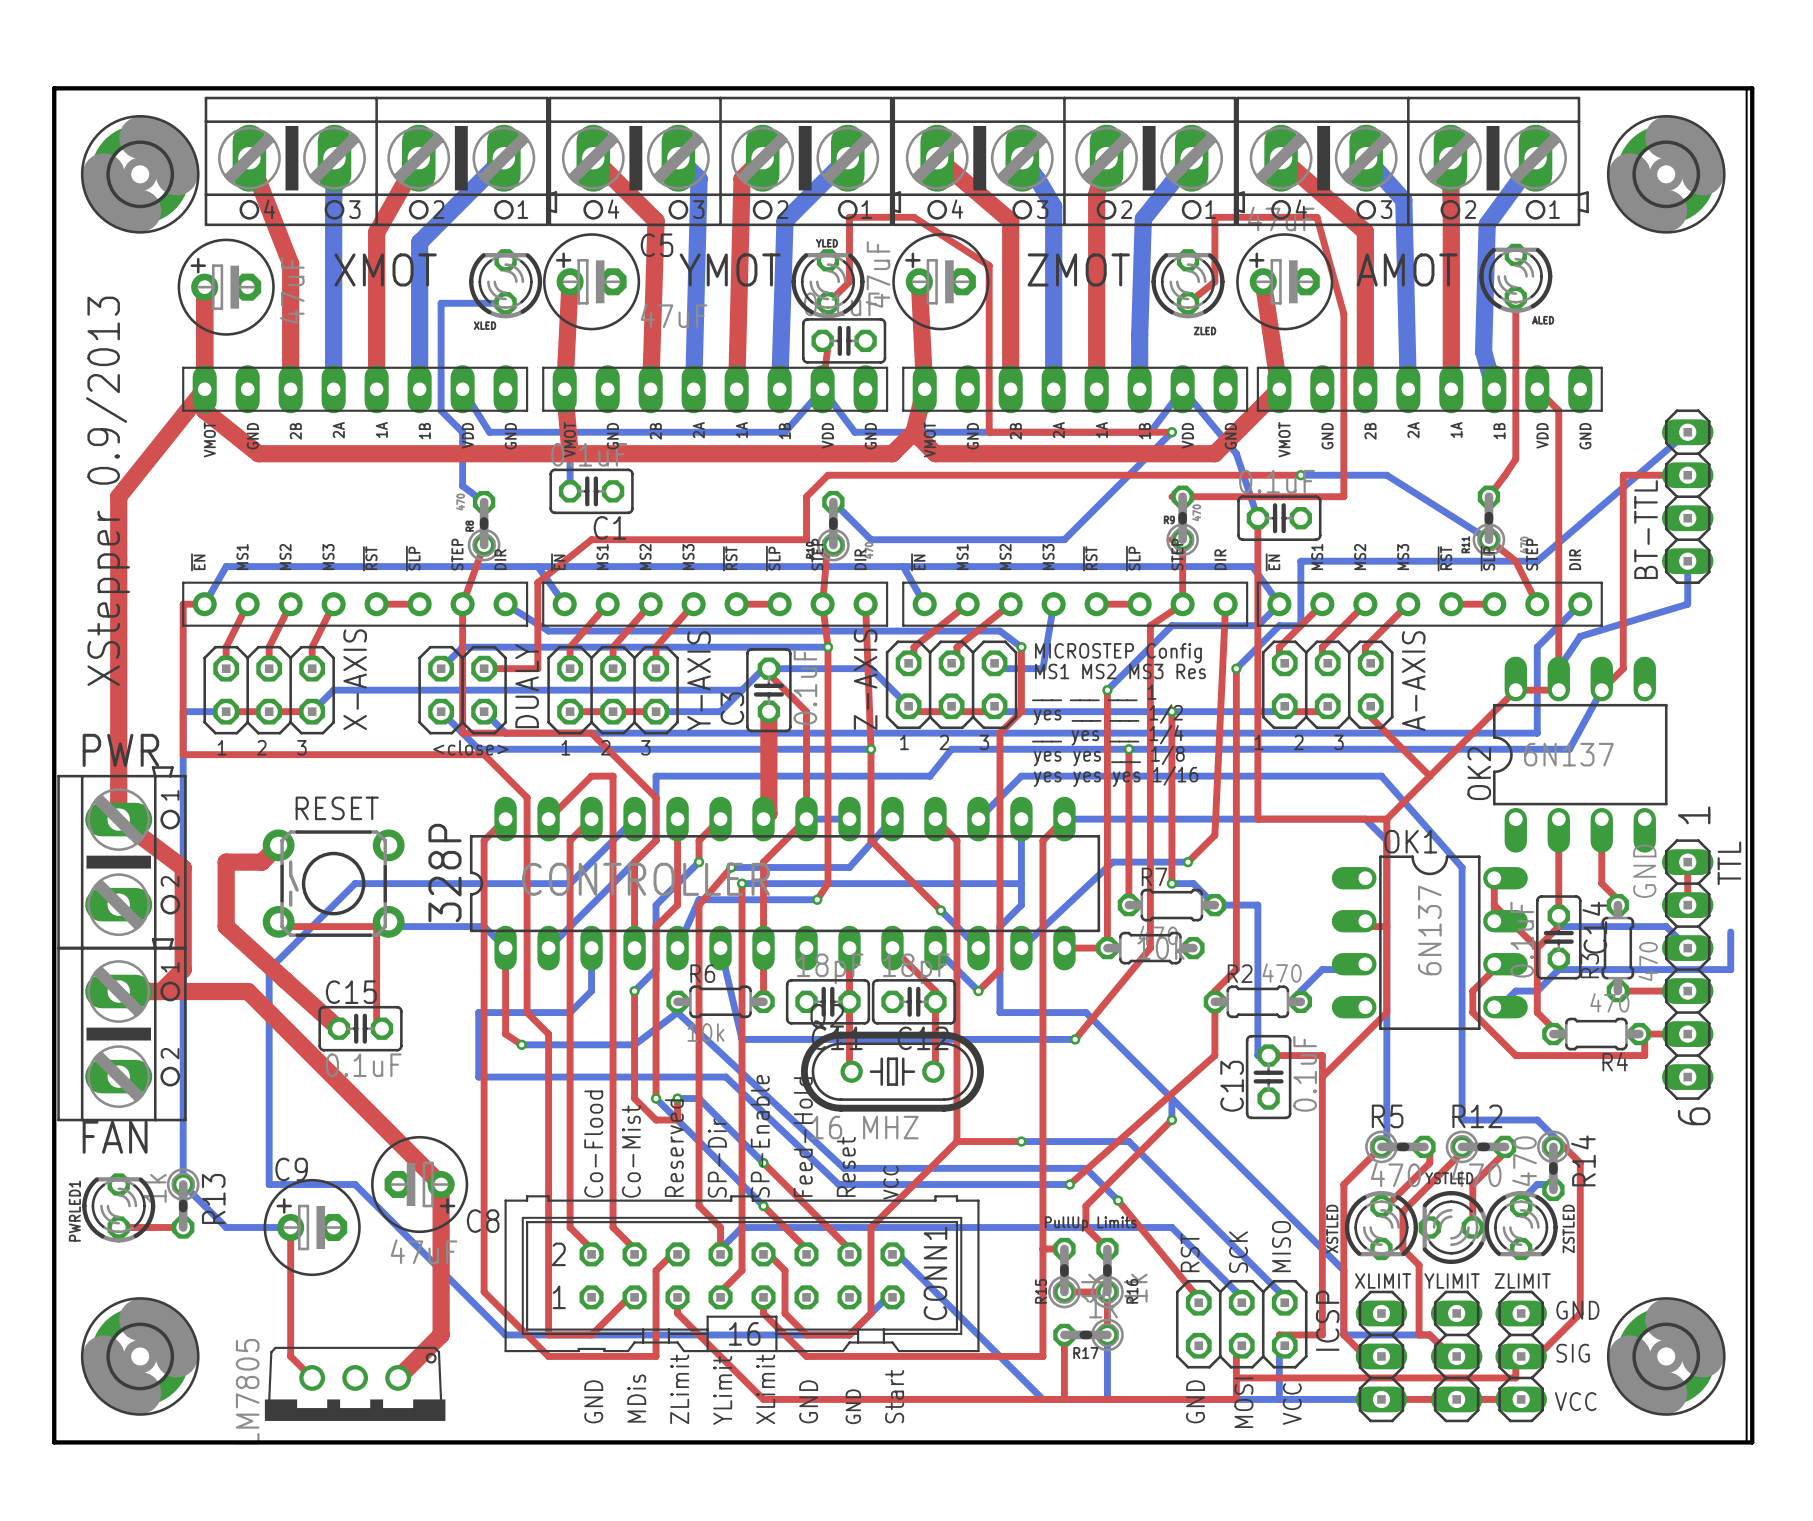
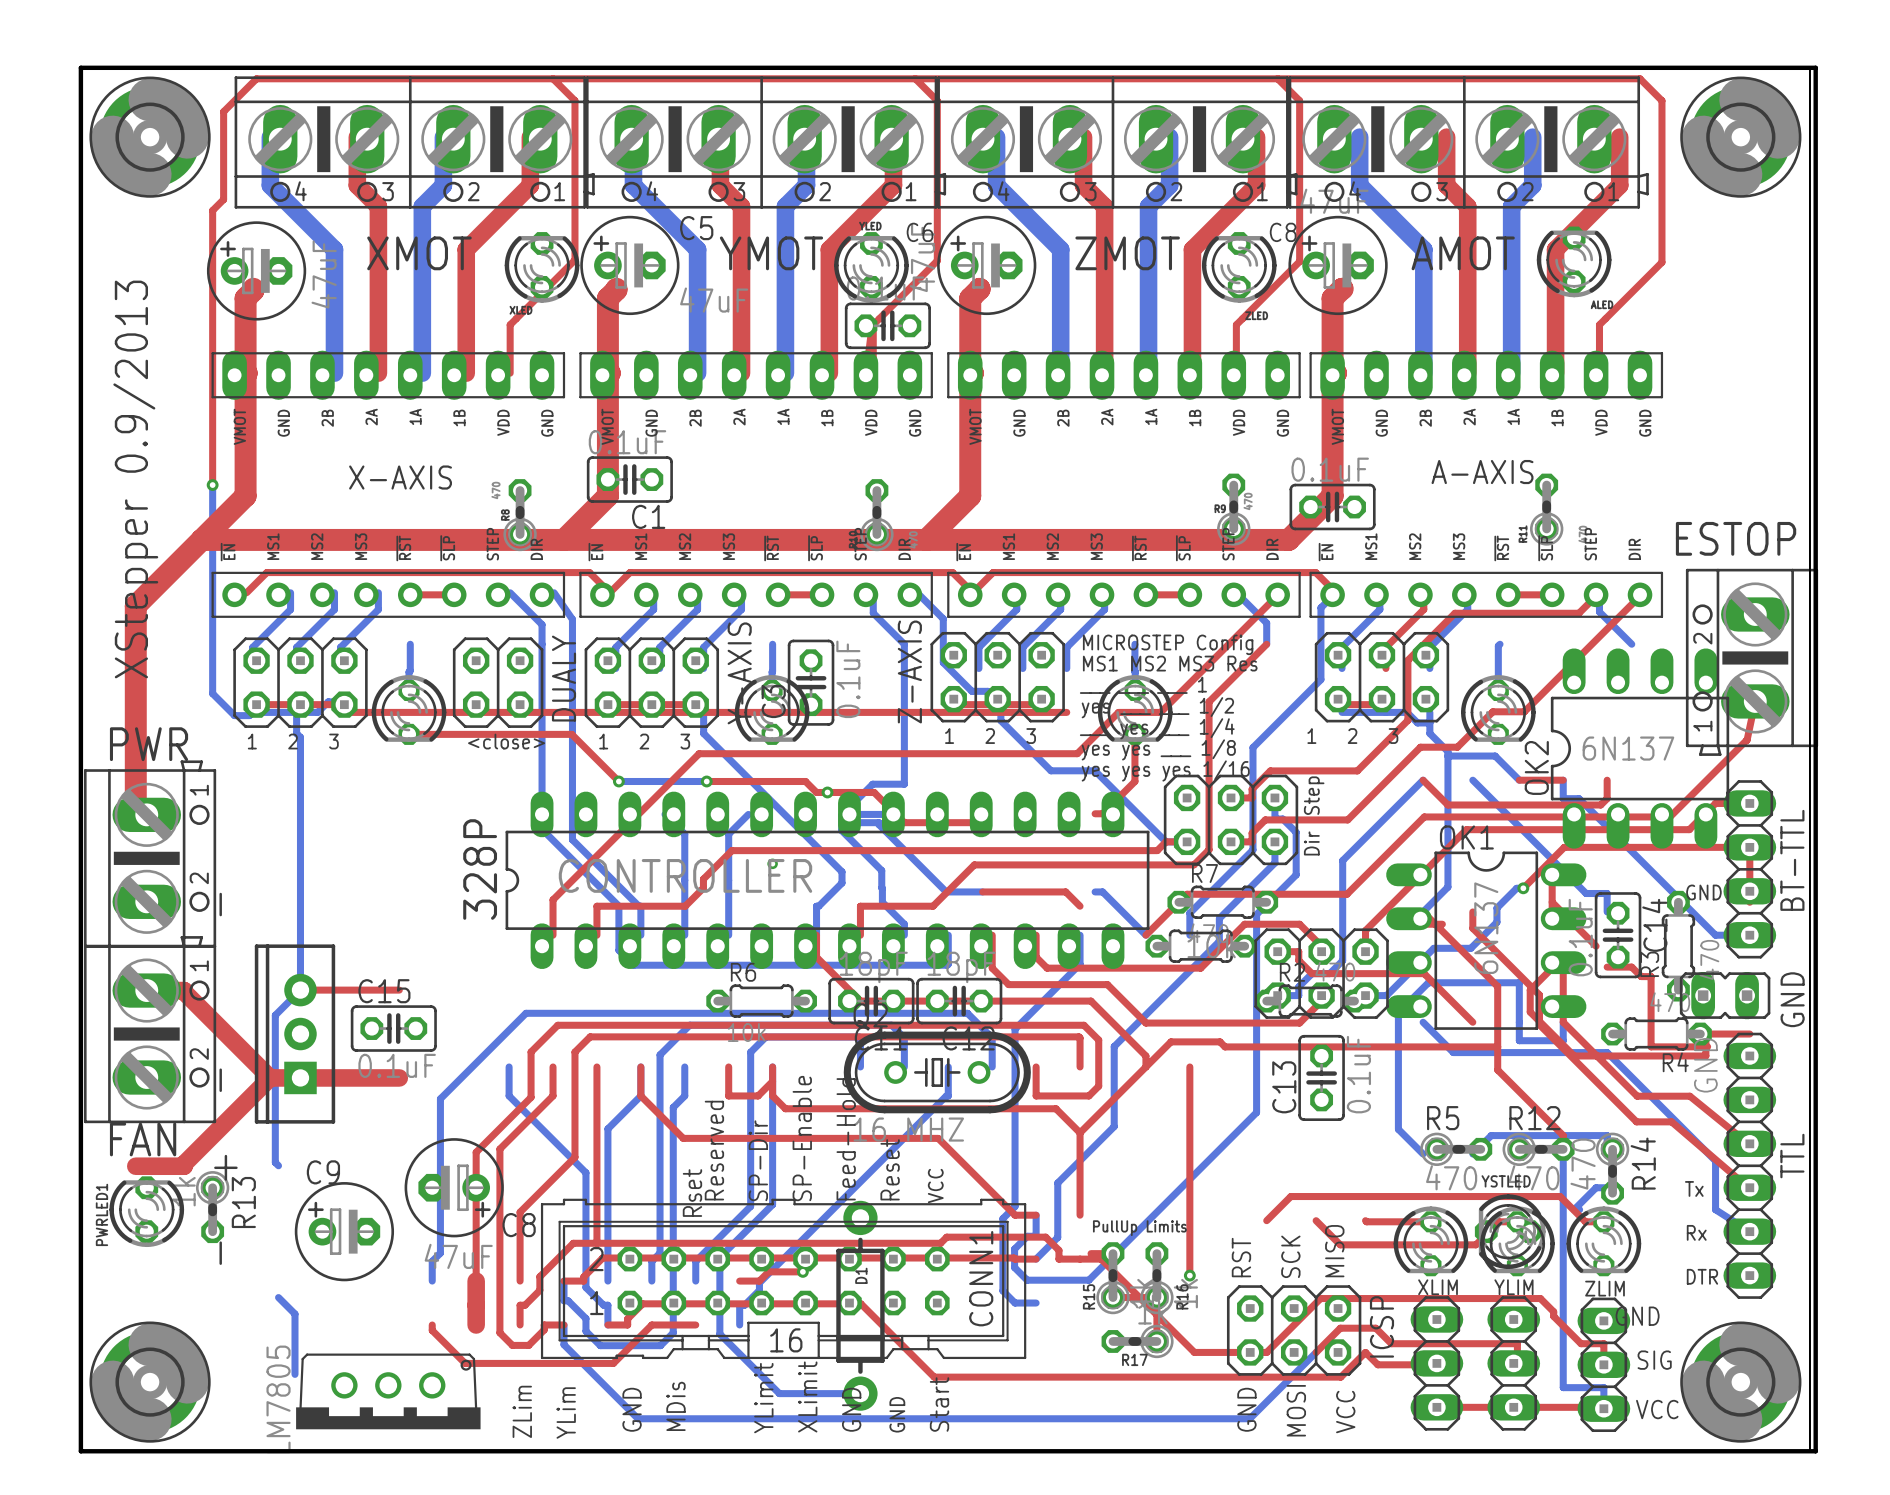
top track: none -> (553, 78) (574, 100) (574, 260) (510, 324) (510, 373)
top track: none -> (915, 78) (937, 100) (937, 260) (873, 324) (873, 373)
top track: none -> (1277, 78) (1299, 100) (1299, 261) (1236, 324) (1236, 373)
bottom track: none -> (270, 137) (270, 185) (334, 249) (334, 373)
top track: none -> (357, 137) (357, 185) (378, 206) (378, 373)
bottom track: none -> (443, 137) (443, 185) (422, 206) (422, 373)
top track: none -> (530, 137) (530, 185) (466, 249) (466, 373)
bottom track: none -> (633, 137) (633, 185) (697, 249) (697, 373)
top track: none -> (720, 137) (720, 185) (741, 206) (741, 373)
bottom track: none -> (806, 137) (806, 185) (785, 206) (785, 373)
top track: none -> (893, 137) (893, 185) (829, 249) (829, 373)
bottom track: none -> (996, 137) (996, 185) (1060, 249) (1060, 373)
top track: none -> (1083, 137) (1083, 185) (1104, 206) (1104, 373)
bottom track: none -> (1169, 137) (1169, 185) (1148, 206) (1148, 373)
top track: none -> (1256, 137) (1256, 185) (1192, 249) (1192, 373)
bottom track: none -> (1359, 137) (1359, 185) (1423, 249) (1423, 373)
top track: none -> (1446, 137) (1446, 185) (1467, 206) (1467, 373)
bottom track: none -> (1532, 137) (1532, 185) (1511, 206) (1511, 373)
top track: none -> (1619, 137) (1619, 185) (1555, 249) (1555, 373)
top track: (249, 158) (290, 263) (290, 389) -> none
bottom track: (334, 158) (333, 389) -> none
top track: (418, 158) (376, 232) (376, 389) -> none
bottom track: (503, 158) (419, 242) (419, 389) -> none
top track: (593, 158) (656, 220) (650, 389) -> none
bottom track: (678, 158) (699, 178) (693, 389) -> none
top track: (762, 158) (742, 178) (736, 389) -> none
bottom track: (847, 158) (785, 220) (779, 389) -> none
top track: (937, 158) (1010, 220) (1010, 389) -> none
bottom track: (1022, 158) (1053, 206) (1053, 389) -> none
top track: (1106, 158) (1096, 194) (1096, 389) -> none
bottom track: (1191, 158) (1143, 219) (1139, 389) -> none
top track: (1281, 158) (1365, 231) (1365, 389) -> none
bottom track: (1366, 158) (1403, 200) (1408, 389) -> none
top track: (1450, 158) (1451, 389) -> none
bottom track: (1535, 158) (1487, 224) (1483, 351) (1494, 389) -> none
part position: (140, 174) -> (150, 137)
part position: (1666, 174) -> (1740, 137)
text: none -> C6 (920, 232)
text: none -> C8 (1283, 232)
top track: (570, 281) (564, 389) (570, 453) -> none
top track: (919, 281) (924, 389) (913, 432) -> none
top track: (1263, 281) (1279, 389) (1214, 453) (935, 453) (913, 432) -> none
top track: (204, 287) (204, 410) (258, 453) (892, 453) (913, 432) -> none
top track: (1515, 297) (1515, 459) (1488, 496) -> none
bottom track: (505, 303) (441, 303) (441, 410) (462, 432) (462, 485) (484, 502) -> none
top track: (828, 303) (849, 281) (849, 217) (913, 217) (989, 265) (989, 432) (1171, 432) -> none
top track: (1188, 303) (1214, 281) (1214, 217) (1316, 217) (1343, 314) (1343, 496) (1171, 496) -> none
top track: none -> (253, 288) (245, 298) (245, 496) (135, 605) (135, 814)
top track: none -> (616, 288) (607, 298) (607, 371) (609, 373) (607, 375) (607, 496) (564, 539)
top track: none -> (979, 289) (970, 298) (970, 370) (972, 373) (970, 375) (970, 496) (926, 539)
top track: none -> (1342, 288) (1332, 298) (1332, 369) (1335, 373) (1332, 376) (1332, 496) (1288, 539) (201, 539)
top track: none -> (1599, 373) (1599, 324) (1661, 262) (1661, 100) (1640, 78) (256, 78) (223, 111) (223, 199) (212, 210) (212, 485)
top track: (204, 389) (118, 496) (118, 819) (183, 867) (183, 969) (161, 991) -> none
bottom track: (462, 389) (489, 432) (785, 432) (822, 389) (854, 432) (1150, 432) (1182, 389) (1236, 453) (1257, 518) -> none
top track: (1537, 389) (1558, 410) (1558, 690) (1515, 690) (1386, 819) -> none
bottom track: (1171, 432) (1064, 539) (870, 539) (828, 496) -> none
via: (1171, 432) -> none
bottom track: (1687, 432) (1537, 561) (1300, 561) (1300, 625) (1279, 625) (1236, 668) -> none
top track: (1300, 475) (828, 475) (806, 496) (806, 539) (591, 539) (537, 582) (537, 668) (484, 668) -> none
bottom track: (1300, 475) (1386, 475) (1488, 539) -> none
via: (1300, 475) -> none
top track: (1687, 475) (1623, 475) (1623, 668) (1601, 690) -> none
bottom track: none -> (212, 485) (212, 693) (234, 715) (249, 715) (252, 712) (317, 712) (328, 701) (340, 701) (340, 712)
via: none -> (212, 485)
BT-TTL position: (1687, 496) -> (1749, 869)
top track: (1257, 518) (1257, 819) (1386, 819) -> none
BT-TTL name position: BT-TTL (1646, 529) -> BT-TTL (1792, 860)
top track: (484, 539) (484, 545) (462, 604) (462, 733) (591, 733) (656, 797) (656, 840) (634, 862) (634, 948) -> none
top track: (1171, 539) (1182, 539) (1182, 604) (1150, 625) (1150, 948) (1075, 1039) -> none
top track: (1488, 539) (1515, 561) (1537, 604) -> none
top track: (833, 545) (828, 539) (822, 604) (828, 647) (828, 883) (817, 899) -> none
bottom track: (1687, 561) (1687, 604) (1580, 636) (1558, 668) (1558, 690) -> none
bottom track: (537, 566) (564, 604) -> none
bottom track: (903, 566) (924, 604) -> none
top track: none -> (246, 592) (266, 572) (589, 572) (609, 592) (629, 572) (952, 572) (972, 592) (993, 572) (1315, 572) (1335, 592)
bottom track: none -> (290, 592) (290, 609) (252, 647) (252, 668)
bottom track: none -> (334, 592) (334, 609) (296, 647) (296, 668)
bottom track: none -> (378, 592) (378, 609) (340, 647) (340, 668)
bottom track: none -> (510, 592) (542, 624) (542, 829) (618, 906) (618, 950) (633, 965) (947, 965) (948, 935)
bottom track: none -> (554, 592) (572, 619) (572, 839) (640, 906) (640, 935)
bottom track: none -> (653, 592) (653, 609) (615, 647) (615, 668)
bottom track: none -> (697, 592) (697, 609) (659, 647) (659, 668)
bottom track: none -> (741, 592) (741, 609) (703, 647) (703, 668)
bottom track: none -> (873, 592) (873, 613) (904, 644) (904, 784) (872, 784) (841, 815) (841, 830) (881, 870) (882, 902) (904, 924) (904, 935)
bottom track: none -> (917, 592) (943, 618) (943, 662) (971, 691) (987, 691) (1000, 704) (1000, 720) (1050, 770) (1094, 770) (1166, 841) (1187, 841)
bottom track: none -> (1016, 592) (1016, 609) (978, 647) (978, 668)
bottom track: none -> (1060, 592) (1060, 609) (1022, 647) (1022, 668)
bottom track: none -> (1104, 592) (1104, 609) (1066, 647) (1066, 668)
bottom track: none -> (1236, 592) (1266, 623) (1266, 644)
top track: none -> (1280, 592) (1160, 712) (1118, 712) (1077, 753) (699, 753) (553, 899) (553, 935)
bottom track: none -> (1335, 592) (1320, 607) (1320, 679) (1252, 747) (1252, 849) (1189, 913) (1189, 935)
bottom track: none -> (1379, 592) (1379, 609) (1342, 647) (1342, 668)
top track: none -> (1423, 592) (1423, 609) (1385, 647) (1385, 668)
bottom track: none -> (1467, 592) (1467, 609) (1429, 647) (1429, 668)
top track: none -> (1599, 592) (1578, 613) (1454, 613) (1407, 660) (1407, 720) (1357, 770) (1270, 770) (1252, 789) (1252, 797) (1231, 797)
bottom track: none -> (1599, 592) (1599, 611) (1631, 644)
top track: none -> (1643, 592) (1524, 711) (1492, 711) (1457, 747) (1420, 747) (1347, 819) (1265, 819) (1252, 833) (1252, 841) (1231, 841)
top track: (204, 604) (183, 604) (183, 754) (484, 754) (527, 797) (527, 1012) (548, 1034) (548, 1334) (591, 1334) (634, 1291) (634, 1297) -> none
bottom track: (204, 604) (226, 566) (1252, 566) (1279, 604) (1257, 625) (1171, 625) (1107, 690) -> none
top track: (247, 604) (226, 647) (226, 668) -> none
top track: (290, 604) (269, 647) (269, 668) -> none
top track: (333, 604) (312, 647) (312, 668) -> none
bottom track: (505, 604) (548, 631) (999, 631) (1021, 647) -> none
top track: (607, 604) (570, 647) (570, 668) -> none
top track: (650, 604) (613, 647) (613, 668) -> none
top track: (693, 604) (656, 647) (656, 668) -> none
top track: (865, 604) (870, 749) (870, 840) (940, 910) -> none
top track: (967, 604) (913, 647) (913, 668) (908, 663) -> none
top track: (1010, 604) (956, 647) (956, 668) (951, 663) -> none
bottom track: (1053, 604) (1042, 668) (999, 668) (994, 663) -> none
top track: (1225, 604) (1214, 835) (1188, 862) -> none
top track: (1322, 604) (1279, 647) (1279, 668) (1284, 663) -> none
top track: (1365, 604) (1322, 647) (1322, 668) (1327, 663) -> none
top track: (1408, 604) (1365, 647) (1365, 668) (1370, 663) -> none
bottom track: (1580, 604) (1537, 647) (1537, 733) (505, 733) (484, 711) -> none
bottom track: (828, 647) (462, 647) (441, 668) -> none
via: (828, 647) -> none
top track: (1021, 647) (1021, 711) (999, 733) (999, 969) (978, 991) -> none
via: (1021, 647) -> none
bottom track: none -> (410, 644) (409, 690)
bottom track: none -> (772, 644) (772, 690)
bottom track: none -> (1134, 644) (1135, 690)
top track: none -> (1266, 644) (1209, 701) (1209, 849) (1193, 864) (974, 864) (933, 906) (860, 906) (860, 935)
bottom track: none -> (1500, 644) (1498, 645) (1498, 690)
top track: (768, 668) (763, 668) (806, 711) (806, 819) (763, 862) (763, 1001) -> none
top track: (1236, 668) (1236, 969) (1214, 991) (1214, 1055) (1069, 1184) -> none
via: (1236, 668) -> none
ESTOP: none -> (1752, 662)
X-AXIS name rotation: 0° (355, 679) -> 90° clockwise (400, 477)
X-AXIS name position: X-AXIS (355, 679) -> X-AXIS (400, 477)
A-AXIS name rotation: 0° (1413, 681) -> 90° clockwise (1482, 472)
A-AXIS name position: A-AXIS (1413, 681) -> A-AXIS (1482, 472)
bottom track: (742, 690) (333, 690) (312, 711) -> none
top track: (1107, 690) (1107, 948) (1064, 948) -> none
via: (1107, 690) -> none
bottom track: (1601, 690) (1569, 749) (951, 749) (930, 776) (656, 776) (656, 840) (548, 948) -> none
bottom track: (994, 706) (999, 711) (1279, 711) (1284, 706) -> none
top track: (1370, 706) (1365, 711) (1429, 776) -> none
top track: none -> (1755, 701) (1747, 740)
bottom track: (226, 711) (183, 711) (183, 1184) (226, 1227) (290, 1227) -> none
bottom track: (441, 711) (478, 749) (870, 749) -> none
bottom track: (656, 711) (720, 711) (763, 668) (870, 668) (913, 711) -> none
top track: (768, 711) (768, 813) (763, 819) -> none
top track: (1171, 711) (1171, 883) -> none
via: (1171, 711) -> none
part: none -> (409, 710)
part: none -> (772, 710)
part: none -> (1135, 710)
part: none -> (1498, 710)
top track: none -> (340, 712) (1066, 712)
bottom track: none -> (703, 712) (703, 733) (842, 871) (842, 883) (818, 906) (816, 906) (816, 935)
bottom track: none -> (1342, 712) (1407, 712) (1417, 722) (1429, 722)
bottom track: none -> (1429, 712) (1429, 733) (1447, 751) (1447, 887) (1423, 911)
top track: none -> (409, 734) (571, 734) (618, 781)
top track: none -> (1135, 734) (1134, 781) (1102, 813) (1095, 813)
top track: none -> (1746, 740) (1669, 816) (1424, 816) (1346, 894) (1186, 894) (1145, 935)
via: (870, 749) -> none
top track: (1128, 749) (1128, 905) -> none
via: (1128, 749) -> none
bottom track: none -> (1447, 756) (1495, 756) (1519, 780)
top track: none -> (1423, 780) (1447, 804) (1600, 804) (1607, 798) (1607, 780)
bottom track: none -> (1423, 780) (1342, 860) (1342, 960) (1329, 973) (1311, 973) (1298, 986) (1298, 995) (1277, 995)
bottom track: none -> (1472, 780) (1586, 893) (1607, 893) (1607, 911)
top track: none -> (1519, 780) (1563, 780)
bottom track: none -> (1563, 780) (1563, 798) (1578, 798) (1715, 935) (1749, 935)
bottom track: none -> (618, 781) (706, 781)
via: none -> (618, 781)
top track: none -> (706, 781) (805, 781) (816, 792) (874, 792) (904, 822) (973, 822) (982, 813)
via: none -> (706, 781)
via: none -> (827, 792)
text: none -> Step (1314, 795)
bottom track: none -> (1274, 797) (1274, 819) (1282, 819) (1296, 832) (1296, 874) (1256, 914) (1256, 1112) (1088, 1280) (1027, 1280) (1014, 1267) (1014, 1249) (1027, 1236) (1036, 1236) (1036, 1215)
top track: none -> (1749, 803) (1715, 803) (1689, 829) (1466, 829) (1365, 930) (1365, 951)
text: 1 (1694, 815) -> none
top track: (505, 819) (484, 840) (484, 1208) -> (1080, 1066) (1078, 1036) (590, 1036) (574, 1052) (574, 1157) (520, 1212)
top track: (548, 819) (591, 776) (613, 776) (613, 1227) (634, 1248) (634, 1254) -> none
top track: (591, 819) (570, 840) (570, 1227) (591, 1248) (591, 1254) -> none
bottom track: none -> (665, 814) (684, 834) (684, 935)
bottom track: (634, 819) (570, 883) (355, 883) (269, 969) -> (296, 712) (296, 733) (300, 737) (300, 968)
top track: (677, 819) (677, 905) (656, 926) (656, 1098) -> none
bottom track: none -> (748, 814) (728, 834) (728, 935)
top track: (720, 819) (699, 840) (699, 862) -> none
bottom track: (892, 819) (849, 867) (731, 867) -> none
top track: (935, 819) (956, 840) (956, 1141) -> none
bottom track: (978, 819) (1021, 776) (1381, 776) (1462, 867) (1462, 983) -> (1423, 1154) (1398, 1129) (1398, 1012) (1428, 982) (1519, 982)
bottom track: (1021, 819) (1021, 905) (999, 926) (999, 1012) (1085, 1012) (1343, 1270) (1343, 1334) (1429, 1334) (1451, 1356) (1456, 1356) -> none
top track: (1064, 819) (1042, 840) (1042, 1356) (806, 1356) (763, 1313) (763, 1291) -> none
bottom track: (1064, 819) (1365, 819) (1386, 840) (1386, 1141) (1381, 1146) -> none
top track: (1386, 819) (1386, 1012) (1322, 1077) -> none
top track: (1558, 819) (1558, 926) (1537, 948) (1537, 1012) (1558, 1034) (1553, 1034) -> none
top track: (1601, 819) (1601, 883) (1623, 905) (1617, 905) -> none
part: none -> (1231, 819)
bottom track: none -> (860, 822) (878, 822) (946, 891) (982, 891)
top track: (278, 845) (261, 862) (226, 862) (226, 926) (339, 1028) -> none
top track: none -> (1187, 841) (1166, 841) (1157, 850) (731, 850) (703, 879) (703, 888) (685, 906) (596, 906) (596, 935)
bottom track: none -> (1274, 841) (1274, 862) (1219, 918) (1219, 941) (1114, 1046) (1114, 1126) (1057, 1183) (1057, 1237) (1036, 1259)
text: none -> Dir (1311, 843)
top track: none -> (1749, 847) (1564, 847) (1523, 888)
bottom track: (699, 862) (656, 905) (656, 969) (634, 991) -> none
via: (699, 862) -> none
bottom track: (1188, 862) (1112, 862) (1021, 948) -> none
via: (1188, 862) -> none
TTL name position: TTL (1729, 863) -> TTL (1792, 1156)
top track: (731, 867) (699, 905) (699, 1206) (720, 1227) (720, 1254) -> none
RESET: (333, 883) -> none
top track: (742, 883) (742, 1270) (720, 1291) (720, 1297) -> none
bottom track: (742, 883) (1021, 883) -> none
via: (742, 883) -> none
bottom track: (1171, 883) (1193, 883) (1214, 905) (1257, 905) (1257, 1055) (1268, 1055) -> none
via: (1171, 883) -> none
bottom track: none -> (1523, 888) (1516, 888) (1496, 908) (1496, 922) (1470, 948) (1433, 948) (1386, 995) (1365, 995)
via: none -> (1523, 888)
top track: none -> (982, 891) (1065, 891) (1080, 906)
bottom track: none -> (1095, 891) (1102, 891) (1145, 935)
text: none -> GND (1703, 892)
bottom track: (817, 899) (699, 899) (677, 948) -> none
via: (817, 899) -> none
text: none -> - (220, 904)
bottom track: (940, 910) (978, 948) -> none
via: (940, 910) -> none
top track: none -> (1423, 911) (1497, 986) (1497, 1070) (1563, 1135) (1563, 1154)
top track: none -> (1472, 911) (1472, 928) (1539, 995) (1539, 1024) (1636, 1121) (1671, 1121) (1749, 1187)
bottom track: (1558, 915) (1558, 926) (1666, 926) (1687, 948) -> none
top track: (278, 921) (290, 926) (376, 926) -> none
bottom track: (388, 921) (398, 926) (484, 926) (505, 948) -> none
top track: (376, 926) (376, 1034) (382, 1028) -> none
bottom track: (1730, 931) (1730, 969) (1558, 969) -> none
top track: none -> (816, 935) (816, 957) (860, 1001) (1091, 1001) (1145, 1055) (1145, 1066)
top track: none -> (992, 935) (992, 968) (1008, 984) (1107, 984) (1145, 1023) (1299, 1023) (1321, 1001) (1321, 995)
top track: none -> (1036, 935) (1036, 957) (1047, 968) (1200, 968) (1244, 924) (1299, 924) (1321, 946) (1321, 951)
bottom track: none -> (1080, 935) (1080, 964) (1015, 1029) (1015, 1206) (1002, 1218) (1002, 1290) (1015, 1303) (1036, 1303)
top track: (505, 948) (505, 1034) (521, 1044) -> none
bottom track: (591, 948) (591, 991) (570, 1012) (478, 1012) (478, 1077) (725, 1077) (838, 1184) (1069, 1184) -> none
bottom track: (720, 948) (742, 1039) (1075, 1039) -> none
top track: (849, 948) (849, 1077) (851, 1071) -> none
top track: (892, 948) (935, 991) (935, 1077) (933, 1071) -> none
bottom track: (935, 948) (978, 991) -> none
top track: none -> (1277, 951) (1298, 951) (1298, 960) (1311, 973) (1424, 973) (1472, 1022)
bottom track: (1365, 964) (1365, 969) (1322, 969) (1300, 991) (1300, 1001) -> none
top track: none -> (1563, 967) (1563, 1022) (1637, 1096) (1689, 1096) (1749, 1143)
top track: none -> (1607, 967) (1631, 967) (1641, 976) (1651, 976) (1651, 1046) (1707, 1046)
bottom track: (1558, 969) (1537, 991) (1515, 991) (1494, 1012) (1494, 1007) -> none
TTL position: (1687, 969) -> (1749, 1165)
part: none -> (1321, 973)
top track: (155, 991) (248, 991) (441, 1184) -> (184, 990) (270, 1077)
top track: none -> (300, 990) (399, 990)
bottom track: (269, 991) (269, 1184) (355, 1184) (505, 1334) (849, 1334) (892, 1291) (892, 1297) -> (300, 990) (275, 1015) (275, 1162) (278, 1165)
top track: (634, 991) (634, 1098) (656, 1120) (677, 1120) (677, 1098) -> none
via: (634, 991) -> none
via: (978, 991) -> none
top track: (1617, 991) (1687, 991) -> none
GND: none -> (1725, 995)
bottom track: (677, 1012) (634, 1044) (521, 1044) -> none
bottom track: (677, 1012) (844, 1168) (1085, 1168) (1118, 1200) -> none
bottom track: none -> (1423, 1022) (1453, 1052) (1607, 1052) (1715, 1160) (1715, 1209) (1749, 1231)
part: none -> (294, 1034)
via: (1075, 1039) -> none
bottom track: (1462, 1040) (1462, 1120) (1537, 1120) (1558, 1141) (1553, 1146) -> (1519, 1040) (1563, 1040) (1563, 1022)
via: (521, 1044) -> none
top track: none -> (1497, 1046) (1225, 1046) (1220, 1041) (1171, 1041) (1080, 1132)
top track: (1268, 1055) (1322, 1055) (1322, 1334) (1279, 1334) (1284, 1345) -> none
bottom track: none -> (509, 1066) (509, 1095) (585, 1172) (585, 1287) (603, 1305) (607, 1305) (607, 1324)
top track: none -> (553, 1066) (553, 1095) (499, 1149) (499, 1332) (512, 1345) (528, 1345) (544, 1329) (544, 1324) (564, 1324)
top track: none -> (596, 1066) (596, 1243)
top track: none -> (640, 1066) (640, 1095) (683, 1138) (938, 1138) (1015, 1215) (1036, 1215)
bottom track: none -> (640, 1066) (640, 1095) (607, 1128) (607, 1281)
bottom track: none -> (684, 1066) (684, 1095) (673, 1107) (673, 1332) (660, 1345) (600, 1345) (585, 1331) (585, 1318) (568, 1300) (564, 1300) (564, 1281)
top track: none -> (728, 1066) (728, 1095) (758, 1095) (772, 1081)
top track: none -> (772, 1066) (772, 1095) (785, 1108) (1055, 1108) (1080, 1132)
bottom track: none -> (772, 1066) (772, 1204) (719, 1257) (719, 1334) (779, 1393) (860, 1393)
bottom track: none -> (860, 1066) (859, 1037) (765, 1037) (750, 1052) (750, 1206) (695, 1261) (695, 1281)
bottom track: none -> (904, 1066) (904, 1037) (891, 1025) (689, 1025) (660, 1054) (660, 1253) (651, 1261) (651, 1281)
bottom track: none -> (948, 1066) (948, 1095) (759, 1282) (759, 1290) (744, 1305) (739, 1305) (739, 1324)
bottom track: none -> (992, 1066) (992, 1037) (967, 1013) (526, 1013) (440, 1098) (440, 1253) (432, 1261) (432, 1281)
top track: none -> (1036, 1066) (1036, 1095) (1088, 1095) (1098, 1086) (1098, 1040) (1083, 1025) (557, 1025) (531, 1052) (531, 1097) (476, 1152) (476, 1187)
top track: none -> (1189, 1066) (1189, 1275)
top track: none -> (270, 1077) (184, 1164) (184, 1166) (135, 1166)
top track: none -> (270, 1077) (399, 1077)
text: none -> - (220, 1080)
bottom track: (656, 1098) (763, 1206) -> none
via: (656, 1098) -> none
bottom track: (677, 1098) (699, 1098) (763, 1163) -> none
via: (677, 1098) -> none
bottom track: (1171, 1098) (1171, 1120) -> none
text: 6 (1694, 1116) -> none
top track: (1171, 1120) (1085, 1206) (1085, 1227) (1107, 1248) -> none
via: (1171, 1120) -> none
top track: none -> (1080, 1132) (1080, 1215)
top track: (956, 1141) (870, 1227) (870, 1313) (849, 1334) (806, 1334) (785, 1313) (785, 1270) (763, 1248) (763, 1254) -> none
top track: (956, 1141) (1021, 1141) -> none
bottom track: (1021, 1141) (1128, 1141) (1279, 1291) (1284, 1302) -> none
via: (1021, 1141) -> none
top track: (1386, 1141) (1343, 1184) (1343, 1334) (1365, 1356) (1381, 1356) -> none
text: Co-Flood (593, 1144) -> none
top track: (1424, 1146) (1429, 1141) (1429, 1163) (1386, 1206) (1381, 1206) -> none
top track: (1462, 1146) (1462, 1152) (1402, 1211) (1402, 1248) (1419, 1265) (1419, 1334) (1429, 1334) (1448, 1353) (1454, 1353) -> none
top track: (1505, 1146) (1505, 1152) (1472, 1184) (1472, 1227) -> none
top track: (1553, 1146) (1558, 1141) (1580, 1163) (1580, 1313) (1537, 1356) (1515, 1356) (1515, 1377) (1236, 1377) -> none
text: Co-Mist (631, 1151) -> none
bottom track: none -> (1472, 1154) (1491, 1135) (1607, 1135) (1607, 1154)
bottom track: none -> (1563, 1154) (1563, 1387) (1603, 1387) (1603, 1408)
top track: (763, 1163) (849, 1248) (849, 1254) -> none
via: (763, 1163) -> none
text: none -> + (225, 1167)
top track width: thick (441, 1184) (441, 1275) -> thin (476, 1187) (476, 1281)
via: (1069, 1184) -> none
text: none -> Tx (1694, 1188)
text: none -> Rset (692, 1193)
top track: (1118, 1200) (1193, 1291) (1198, 1302) -> none
via: (1118, 1200) -> none
top track: (763, 1206) (806, 1248) (806, 1254) -> none
via: (763, 1206) -> none
top track: none -> (1266, 1220) (1290, 1196) (1560, 1196) (1585, 1221) (1603, 1221)
top track: none -> (1316, 1220) (1340, 1244) (1475, 1244) (1498, 1221) (1517, 1221)
top track: none -> (1365, 1220) (1430, 1221)
XSTLED: (1381, 1225) -> none
ZSTLED: (1521, 1225) -> none
top track: (118, 1227) (183, 1227) -> none
top track: (290, 1227) (290, 1356) (312, 1377) -> none
text: none -> Rx (1696, 1232)
part: none -> (1430, 1241)
part: none -> (1517, 1241)
part: none -> (1603, 1241)
text: none -> - (220, 1253)
top track: (677, 1254) (677, 1248) (656, 1270) (656, 1356) (575, 1356) -> (695, 1324) (651, 1324) (613, 1363)
bottom track: (720, 1254) (720, 1248) (742, 1227) (1171, 1227) (1236, 1291) (1241, 1302) -> none
bottom track: (892, 1254) (892, 1248) (1042, 1399) (1381, 1399) -> none
top track: none -> (1036, 1259) (602, 1258) (583, 1276) (583, 1281) (564, 1281)
top track: none -> (802, 1271) (768, 1271) (759, 1281) (739, 1281)
via: none -> (802, 1271)
via: none -> (1189, 1275)
text: none -> DTR (1702, 1276)
top track: (484, 1275) (484, 1291) (548, 1356) -> (432, 1324) (432, 1330) (465, 1363) (585, 1363)
XLIMIT name: XLIMIT (1383, 1281) -> XLIM (1438, 1287)
YLIMIT name: YLIMIT (1452, 1281) -> YLIM (1513, 1287)
bottom track: none -> (278, 1297) (294, 1314) (294, 1374)
top track: (677, 1291) (677, 1313) (763, 1399) (1236, 1399) (1236, 1356) (1241, 1345) -> none
D1: none -> (860, 1305)
top track: (441, 1318) (441, 1334) (398, 1377) -> none
top track: none -> (520, 1324) (520, 1305) (525, 1305) (539, 1290) (539, 1276) (573, 1243) (940, 1243) (946, 1237) (1045, 1237) (1058, 1250) (1058, 1259) (1101, 1259) (1194, 1352) (1266, 1352) (1320, 1298) (1540, 1298) (1553, 1311) (1553, 1316) (1581, 1343) (1603, 1343) (1603, 1364)
bottom track: none -> (564, 1324) (564, 1344) (638, 1418) (1249, 1418) (1316, 1352)
top track: none -> (607, 1324) (627, 1324) (627, 1318) (642, 1303) (860, 1303) (934, 1377) (1340, 1377) (1365, 1352) (1377, 1364) (1430, 1364)
top track: (1064, 1334) (1064, 1399) -> none
bottom track: (1107, 1334) (1107, 1399) -> none
top track: none -> (1316, 1352) (1340, 1328) (1375, 1328) (1391, 1343) (1517, 1343) (1517, 1364)
bottom track: (1284, 1345) (1279, 1356) (1279, 1399) -> none
text position: SIG (1573, 1353) -> SIG (1654, 1360)
part position: (140, 1356) -> (150, 1382)
ZLIMIT: (1521, 1356) -> none
part position: (1666, 1356) -> (1740, 1382)
ZLIM: none -> (1603, 1364)
text: ZLimit (679, 1389) -> none
text position: VCC (1575, 1401) -> VCC (1657, 1409)
text: none -> ZLim (522, 1411)
text: none -> YLim (566, 1413)

